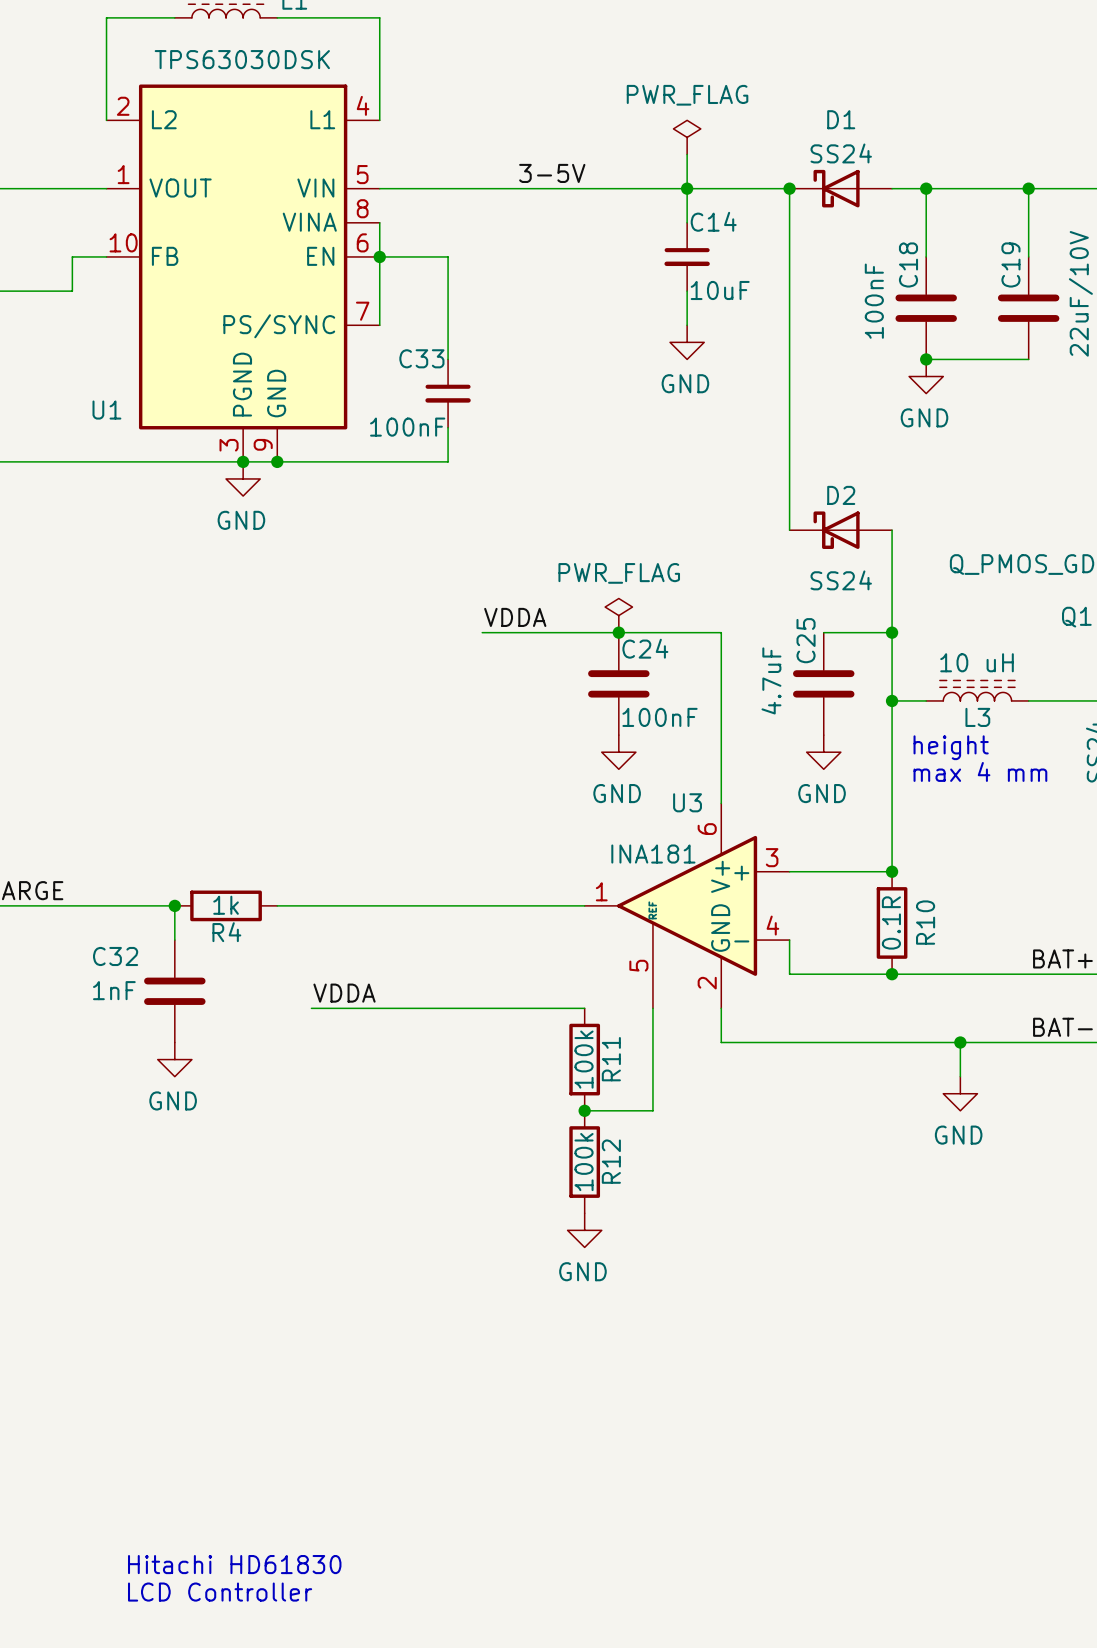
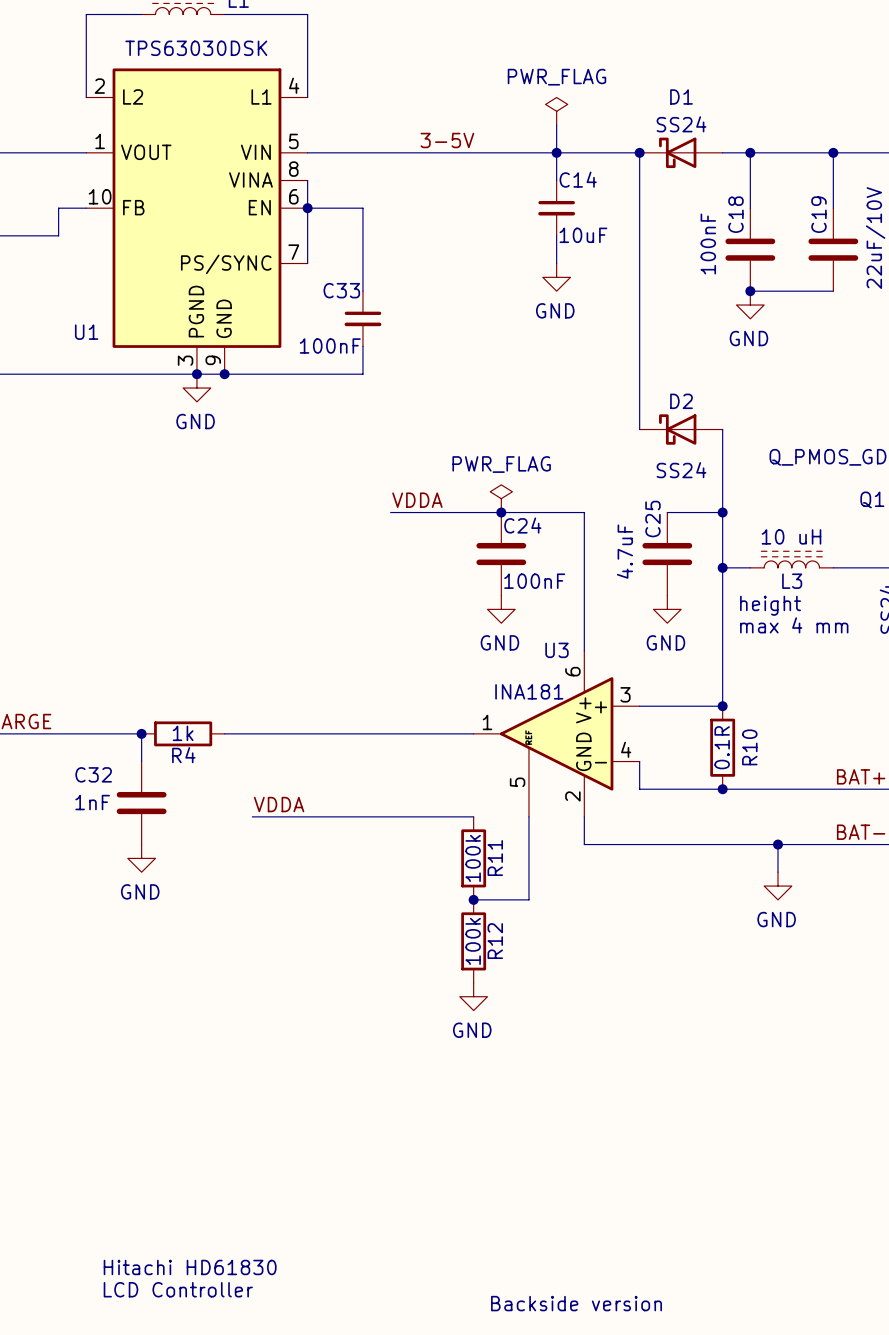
text: none -> Backside version (576, 1303)

